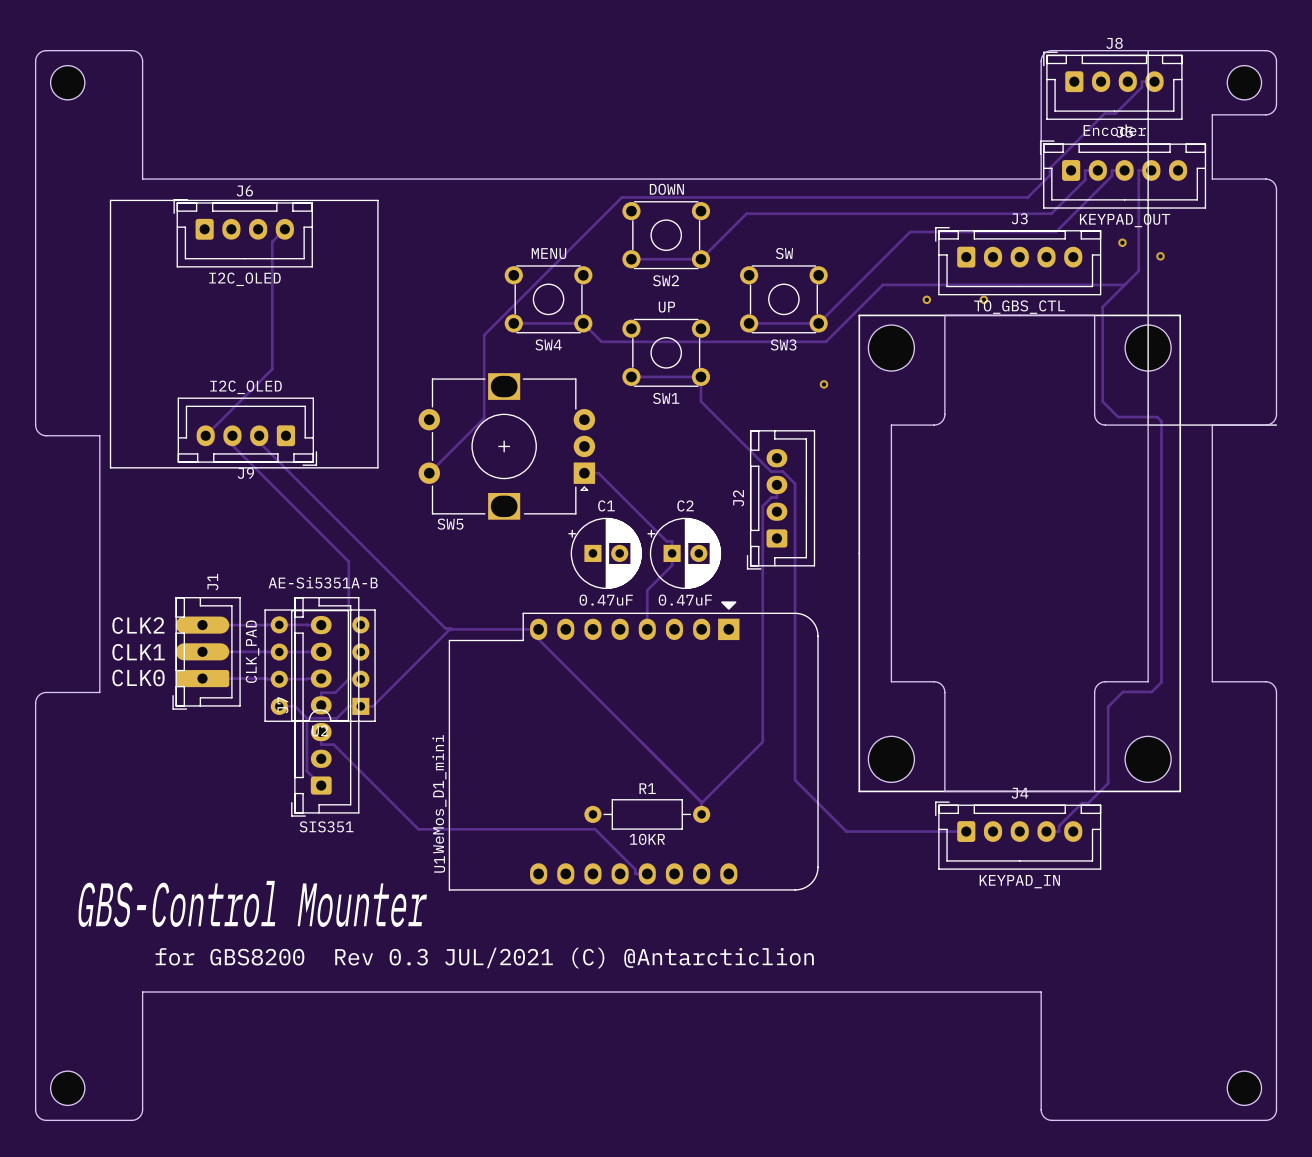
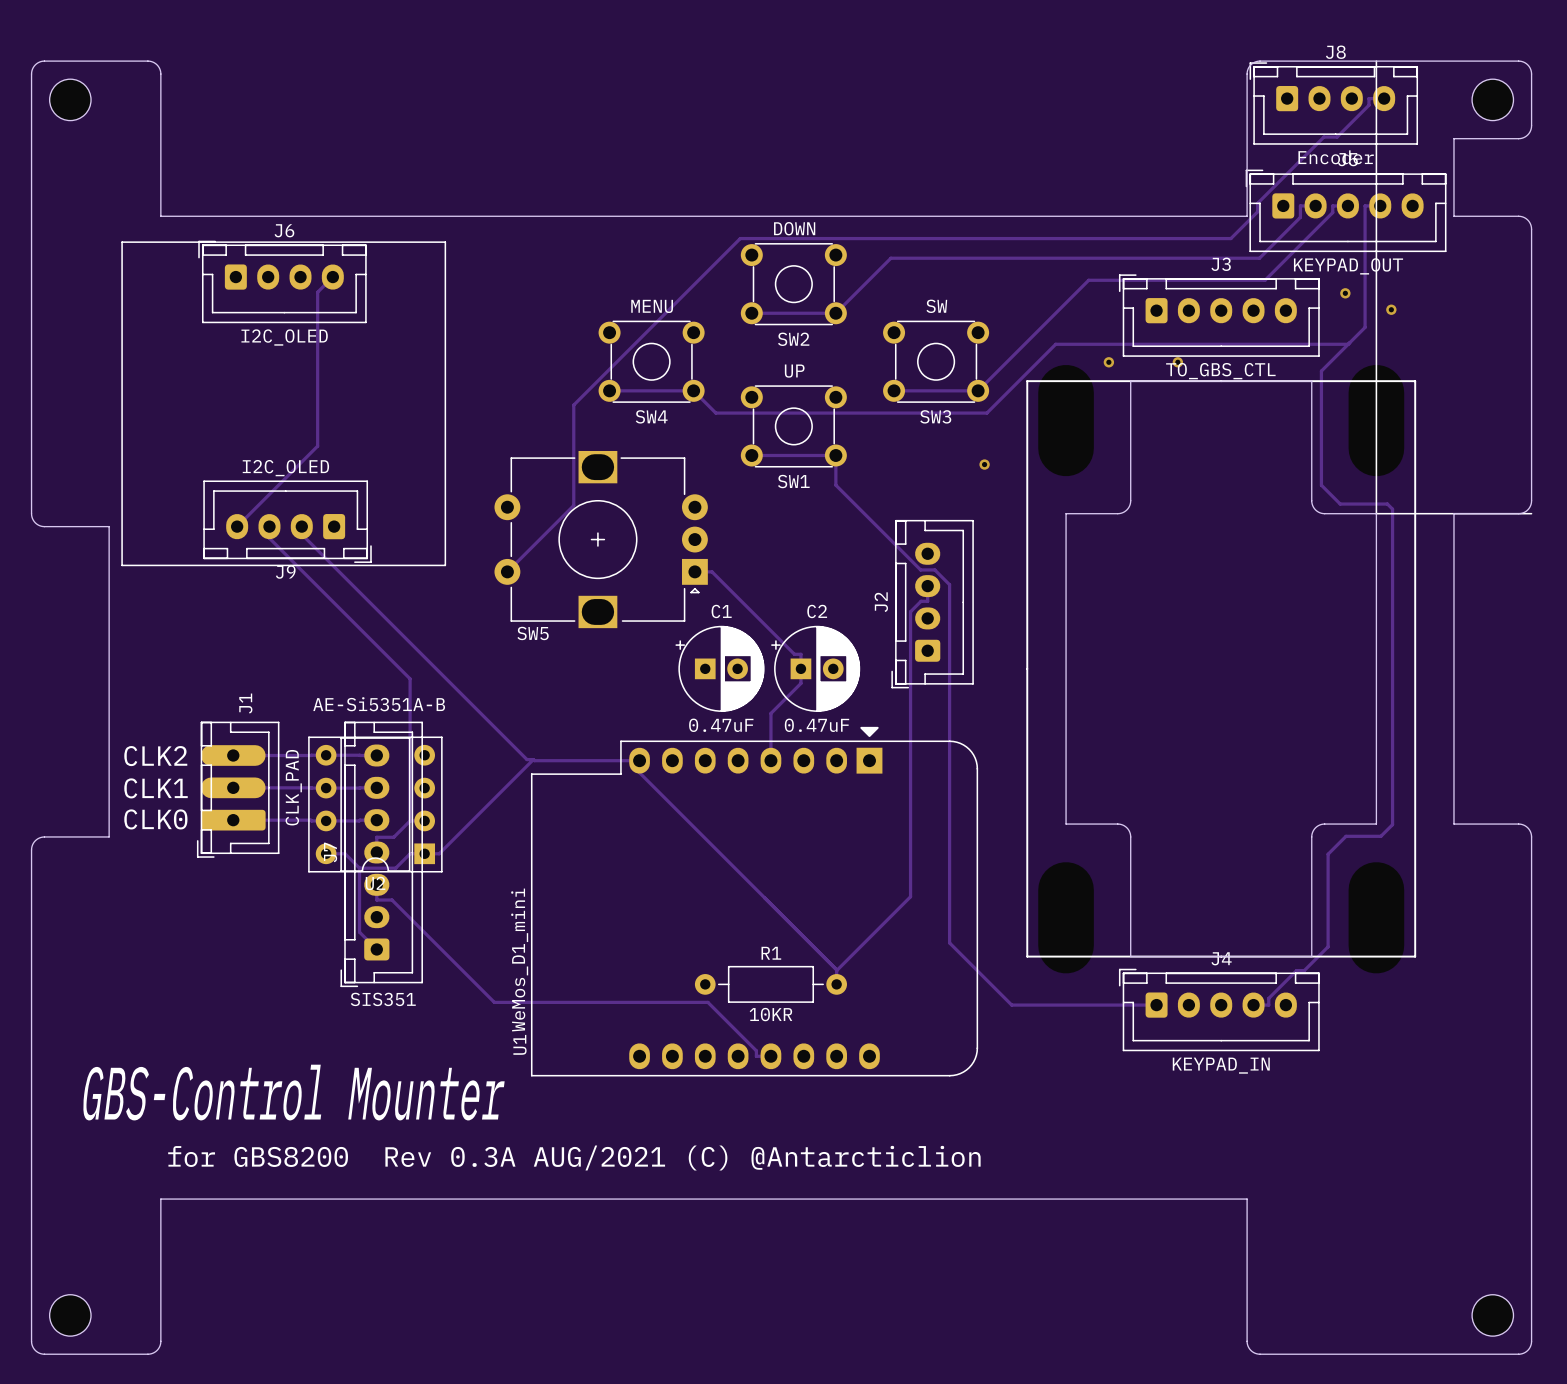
part footprint: [868, 325, 915, 372] -> [1038, 364, 1094, 477]
part footprint: [1125, 325, 1172, 372] -> [1348, 364, 1405, 477]
part footprint: [868, 736, 915, 783] -> [1038, 862, 1094, 974]
part footprint: [1125, 736, 1172, 783] -> [1348, 862, 1405, 974]
text: for GBS8200 Rev 0.3 JUL/2021 (C) @Antarcticlion (484, 958) -> for GBS8200 Rev 0.3A AUG/2021 (C) @Antarcticlion (574, 1158)

